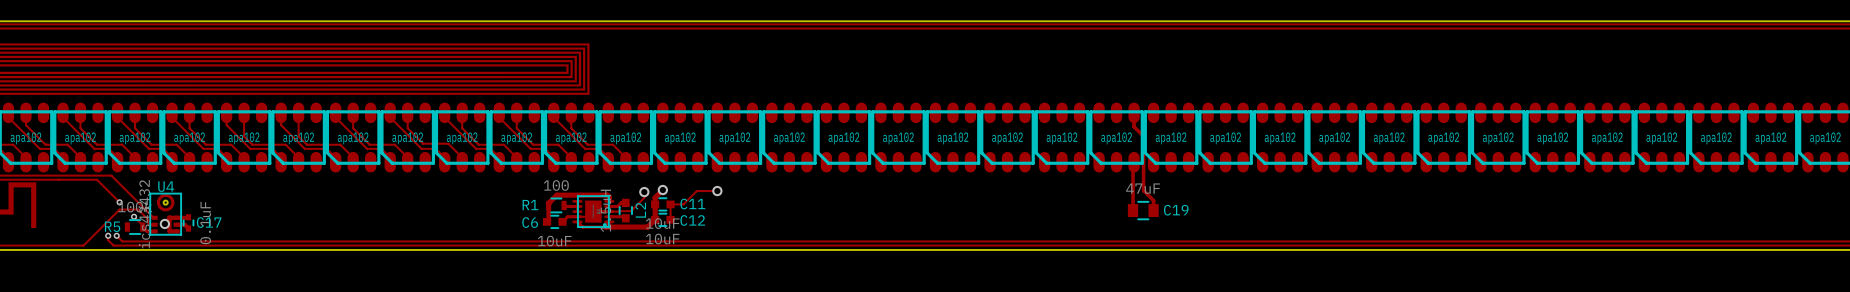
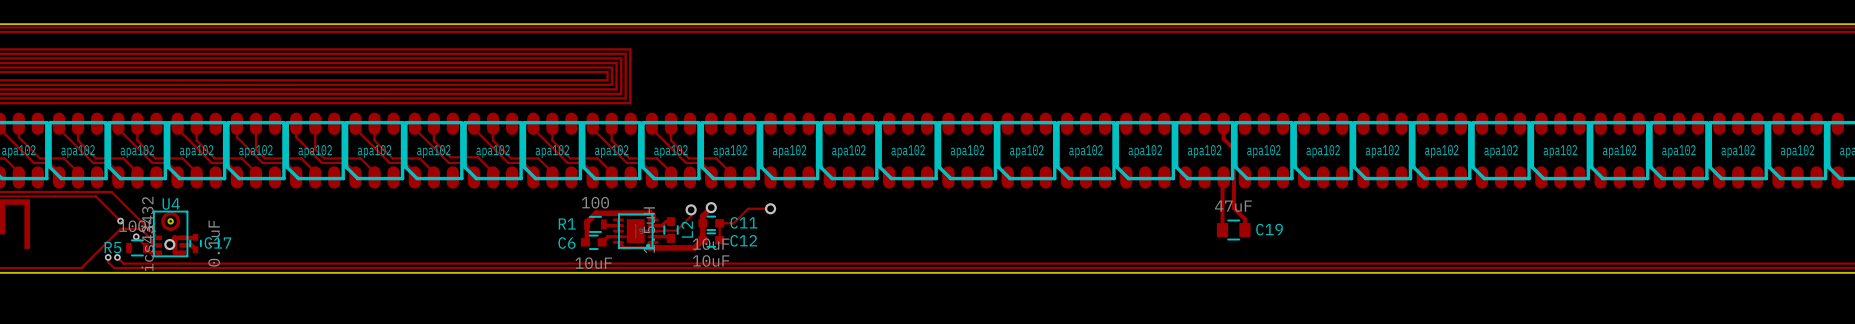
track: none -> (651, 123) (651, 128) (686, 162) (701, 162) (711, 172) (711, 177)
track: none -> (670, 123) (670, 140) (688, 158) (716, 158) (730, 172) (730, 177)

